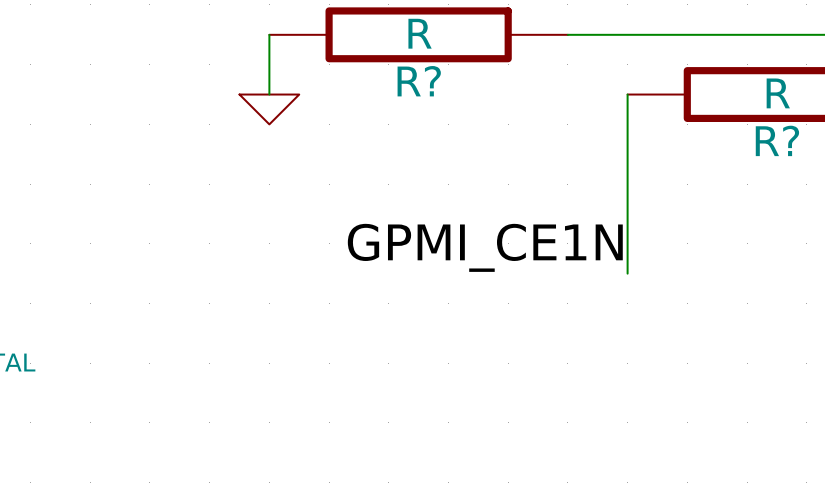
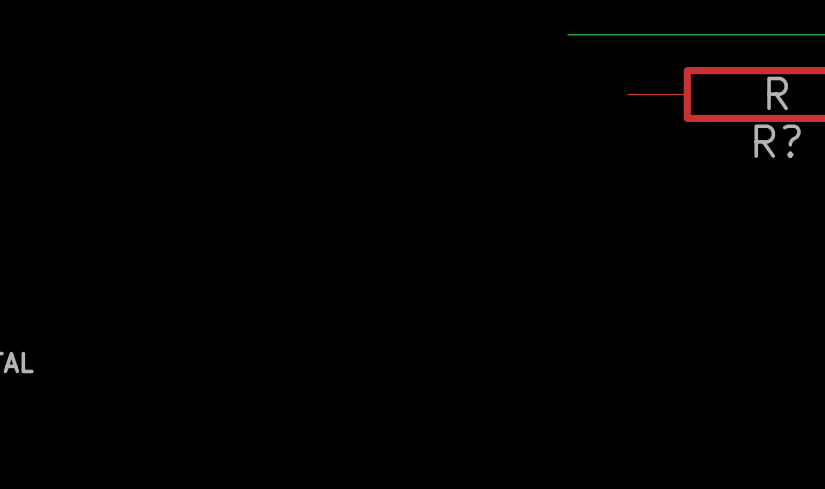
wire: (269, 34) (269, 94) -> none
R?: R (418, 34) -> none
wire: (627, 94) (627, 273) -> none
power symbol: (269, 109) -> none
label: GPMI_CE1N (485, 247) -> none

